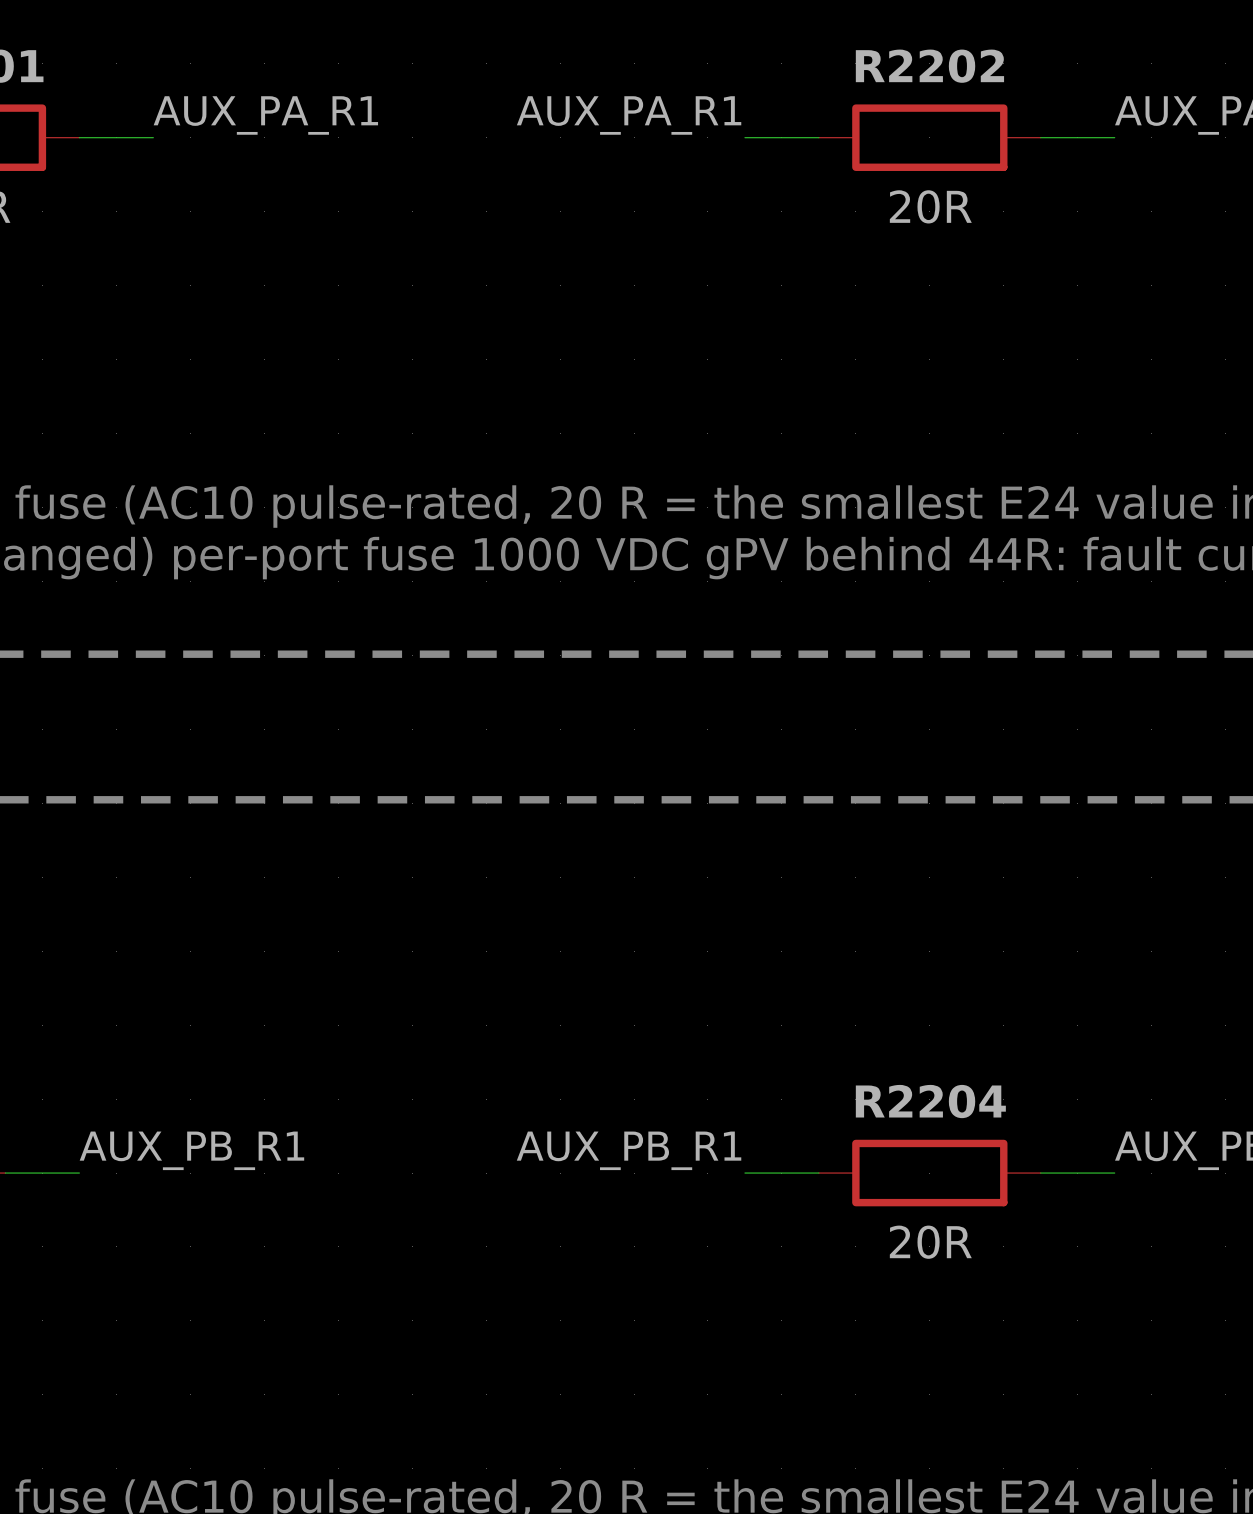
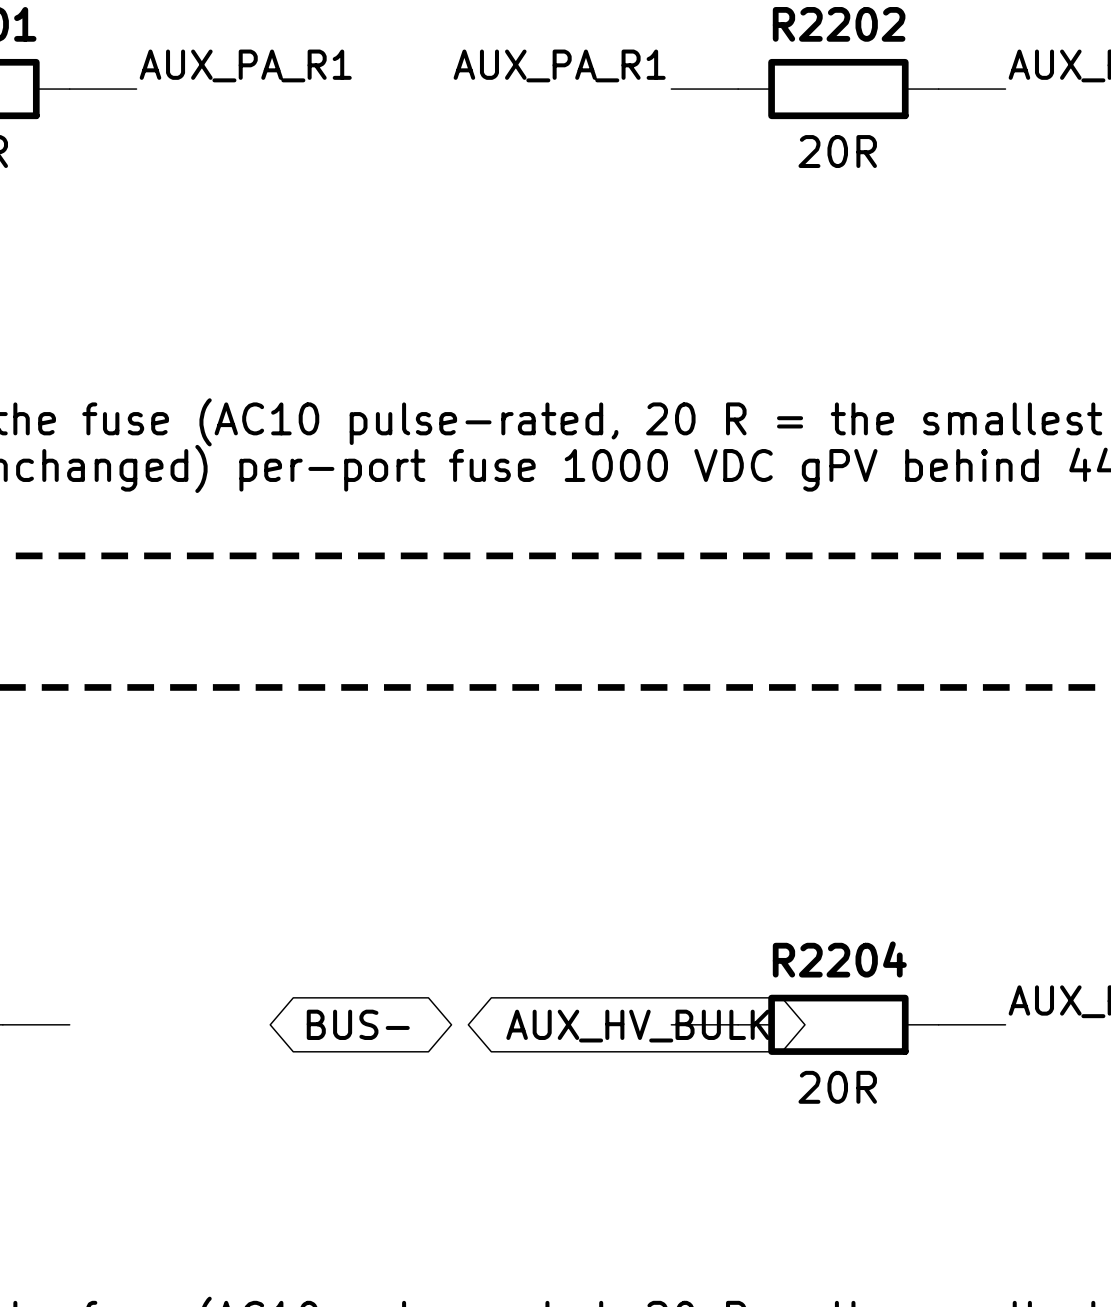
label: AUX_PB_R1 (191, 1150) -> none
label: AUX_PB_R1 (629, 1150) -> none
global label: none -> BUS- (358, 1024)
global label: none -> AUX_HV_BULK (638, 1026)

